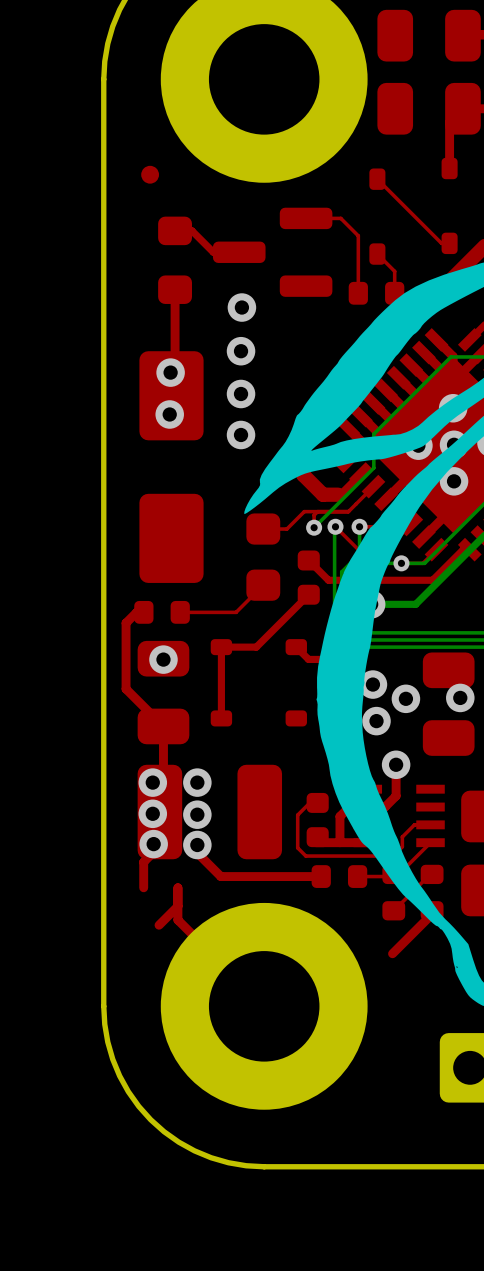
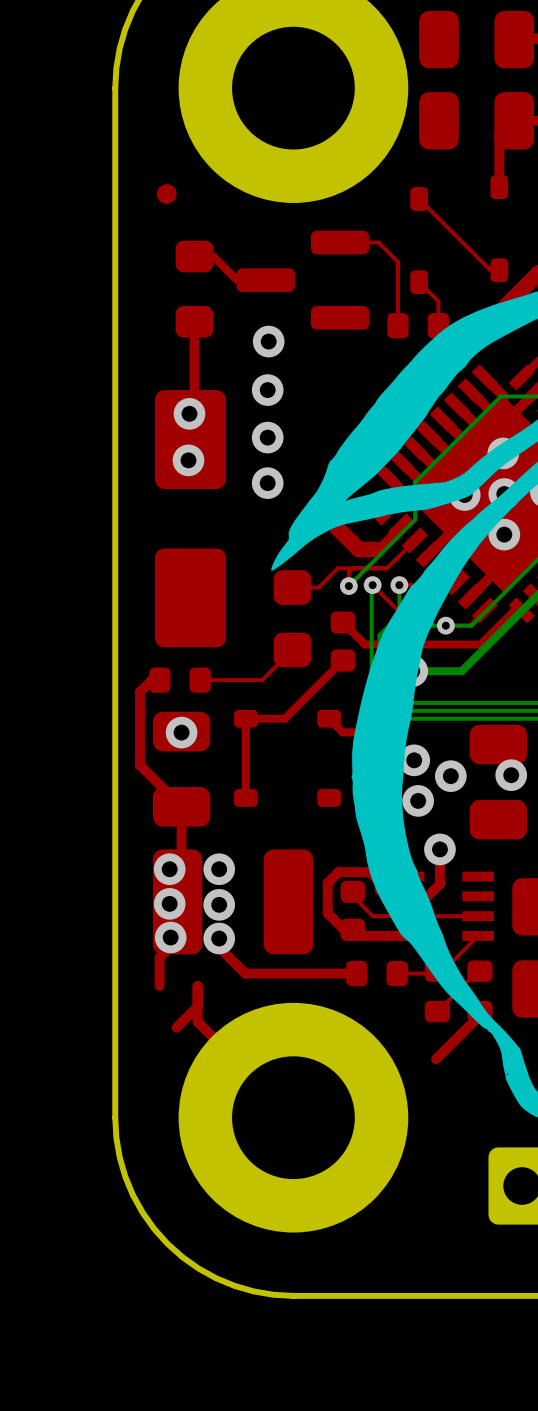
top track: (317, 802) (309, 802) (297, 815) (297, 847) (305, 856) (393, 856) (402, 846) (402, 836) (414, 824) -> (352, 896) (372, 916) (460, 916)
top track: (349, 807) (339, 816) (339, 842) -> (388, 896) (379, 890) (379, 882) (369, 872) (338, 872) (327, 882) (327, 913) (348, 934) (352, 934)

